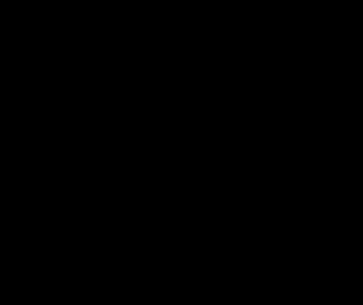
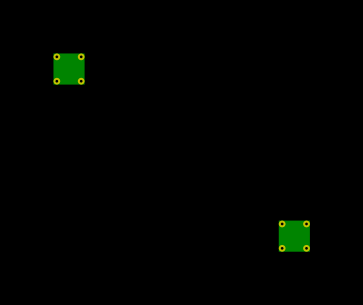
part: none -> (69, 69)
part: none -> (294, 236)

